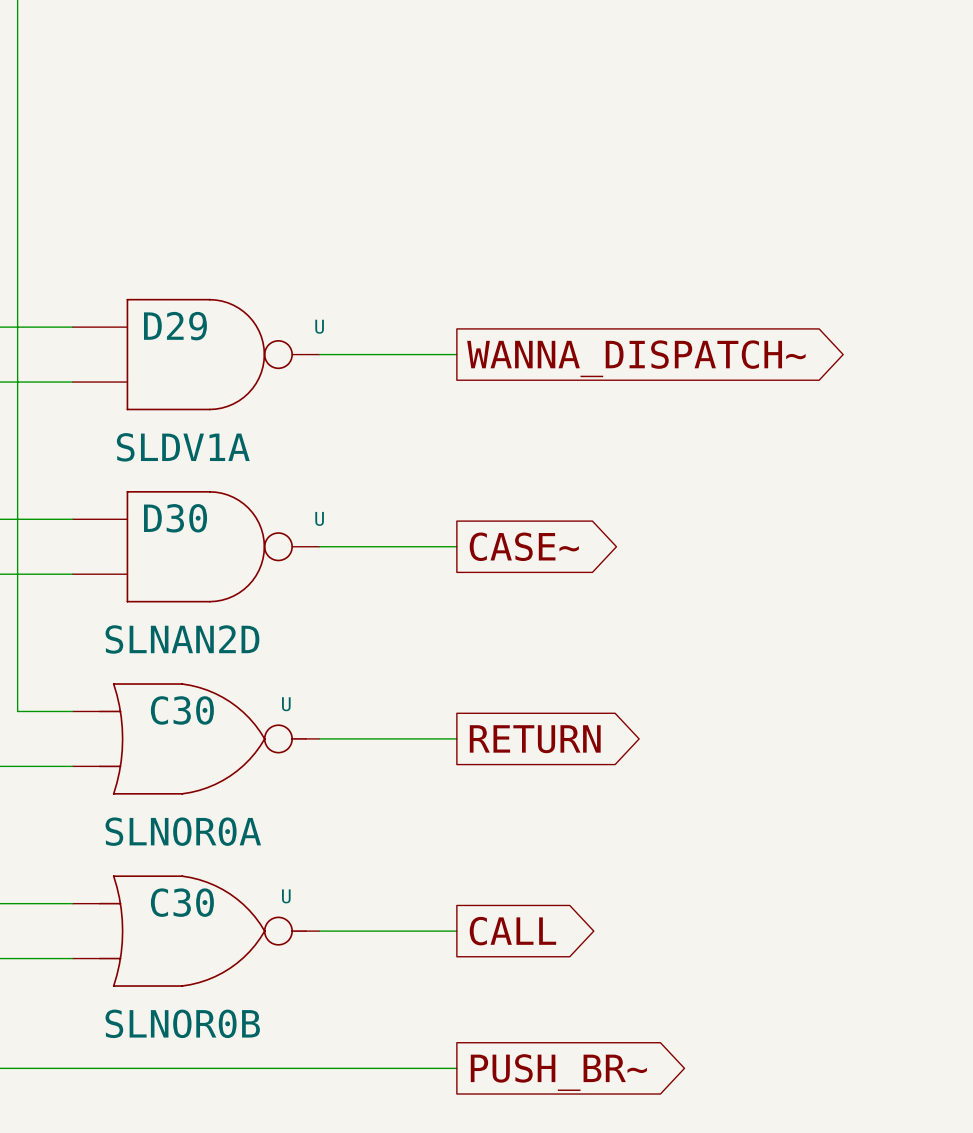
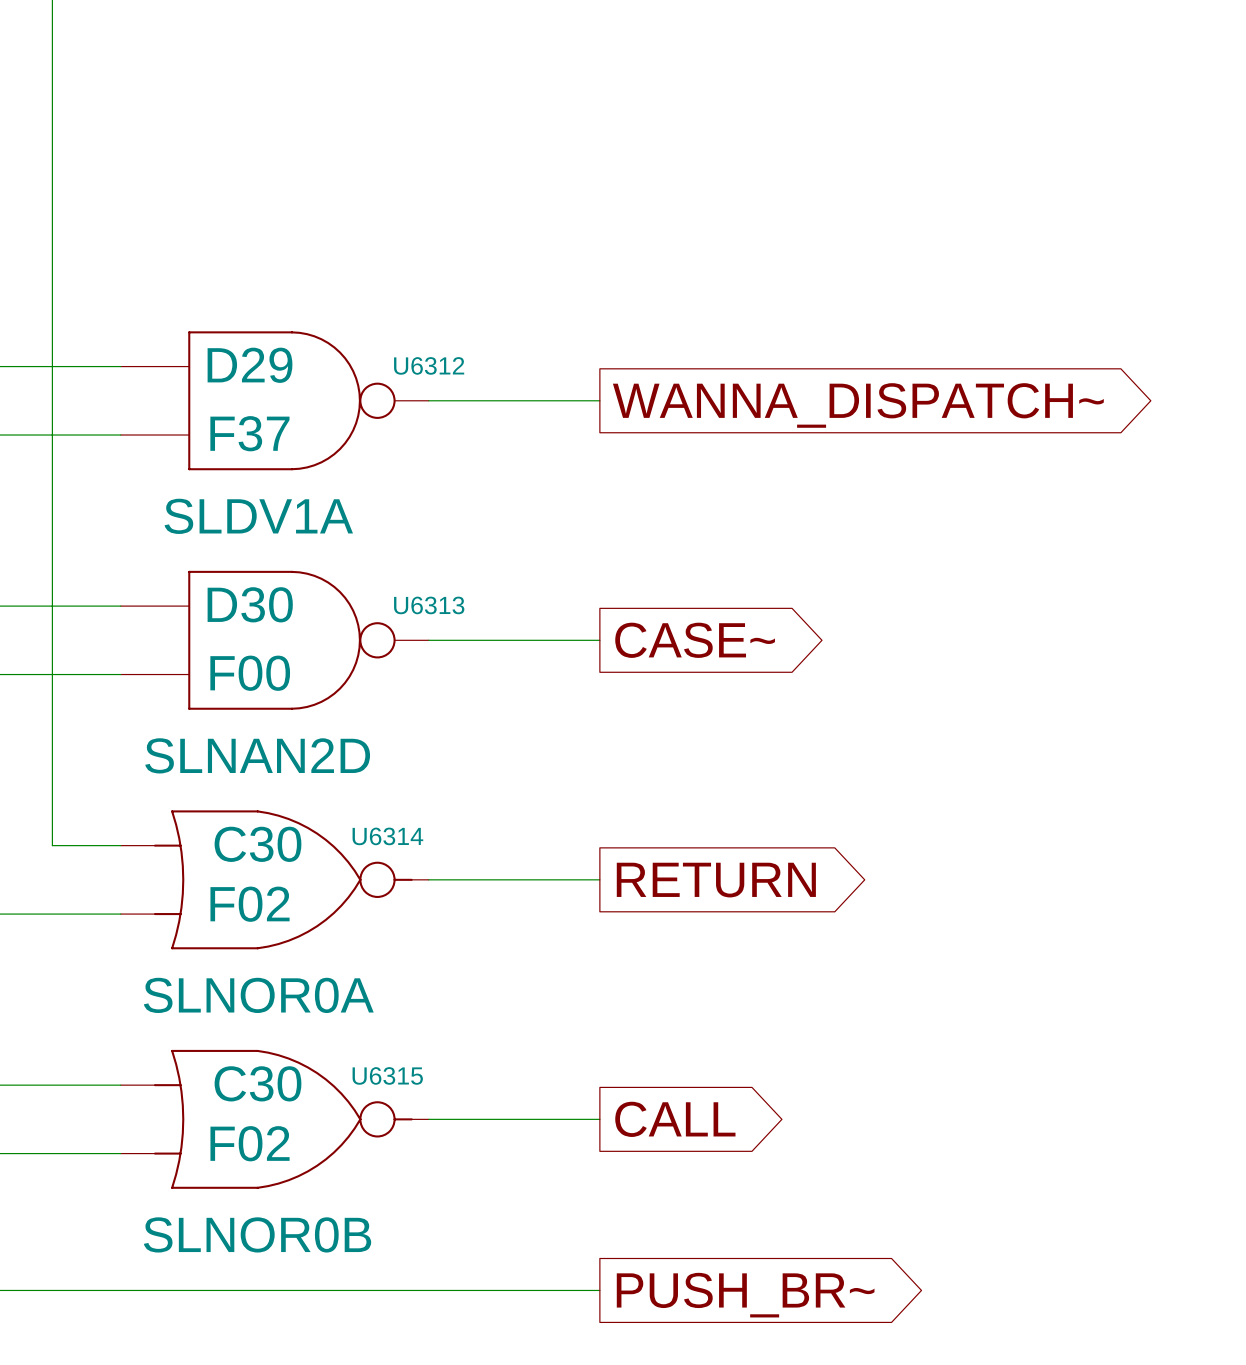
U name: U (319, 326) -> U6312 (429, 365)
U value: none -> F37 (249, 433)
U name: U (319, 518) -> U6313 (429, 605)
U value: none -> F00 (250, 673)
U name: U (286, 704) -> U6314 (387, 836)
U value: none -> F02 (250, 904)
U name: U (286, 896) -> U6315 (387, 1075)
U value: none -> F02 (250, 1143)

